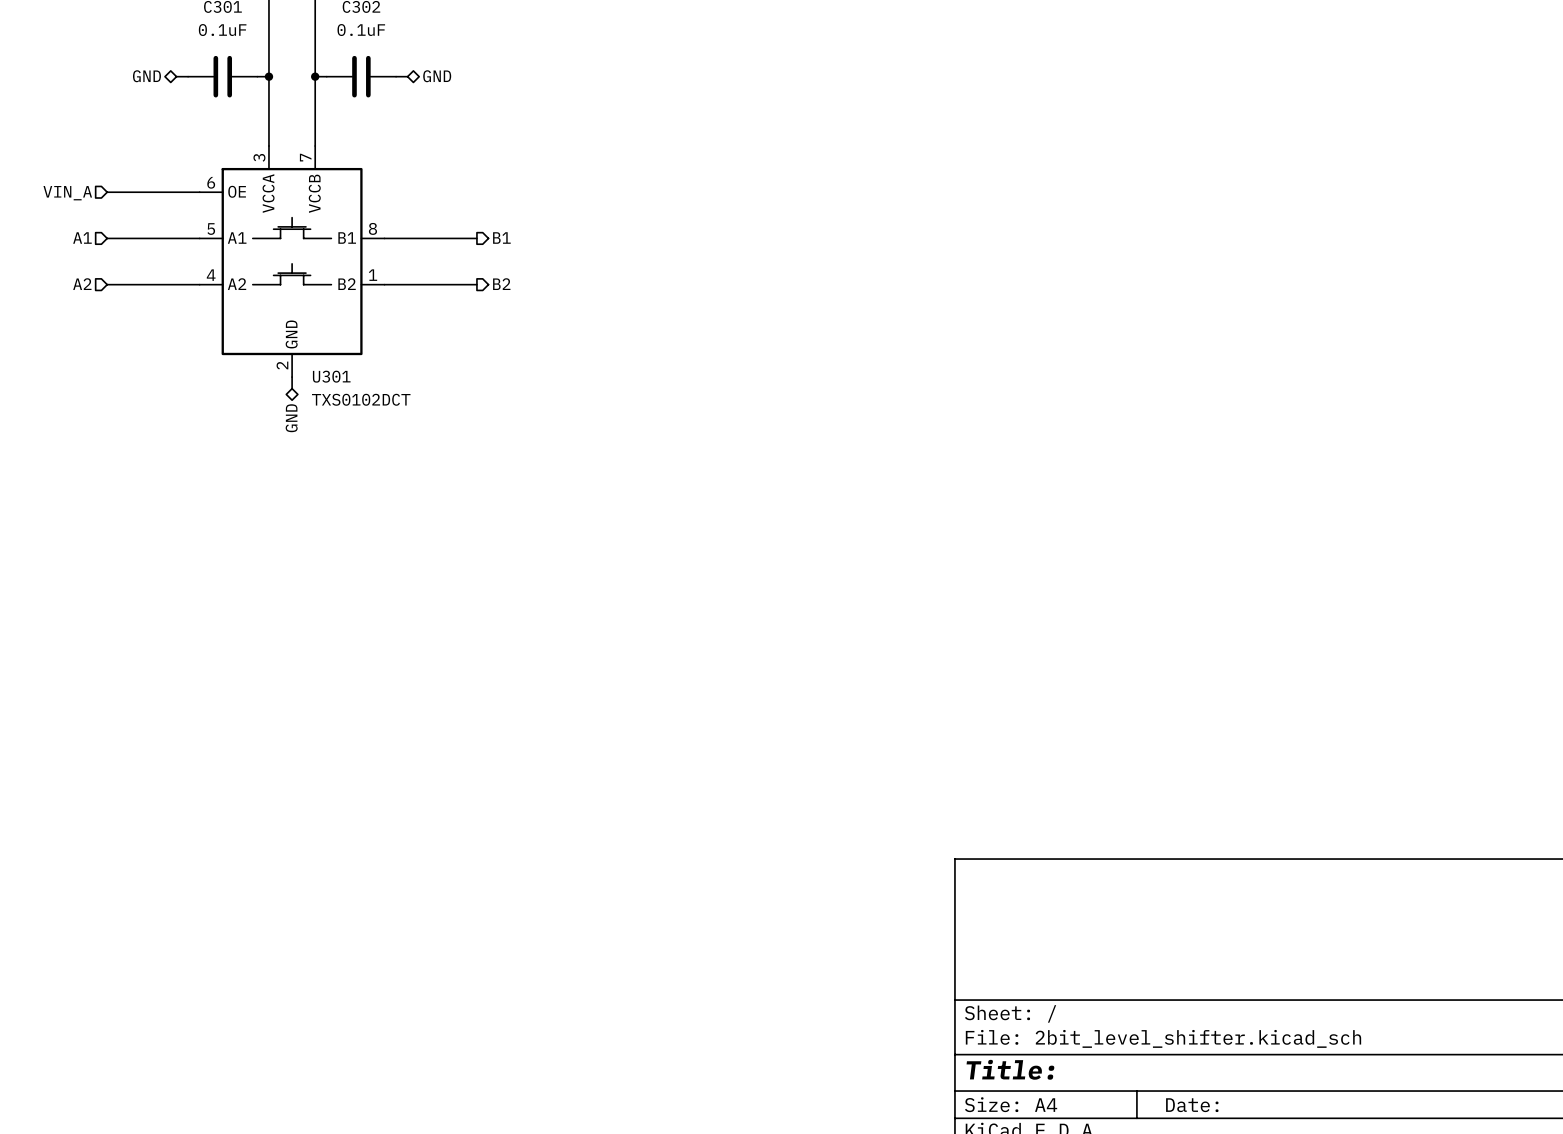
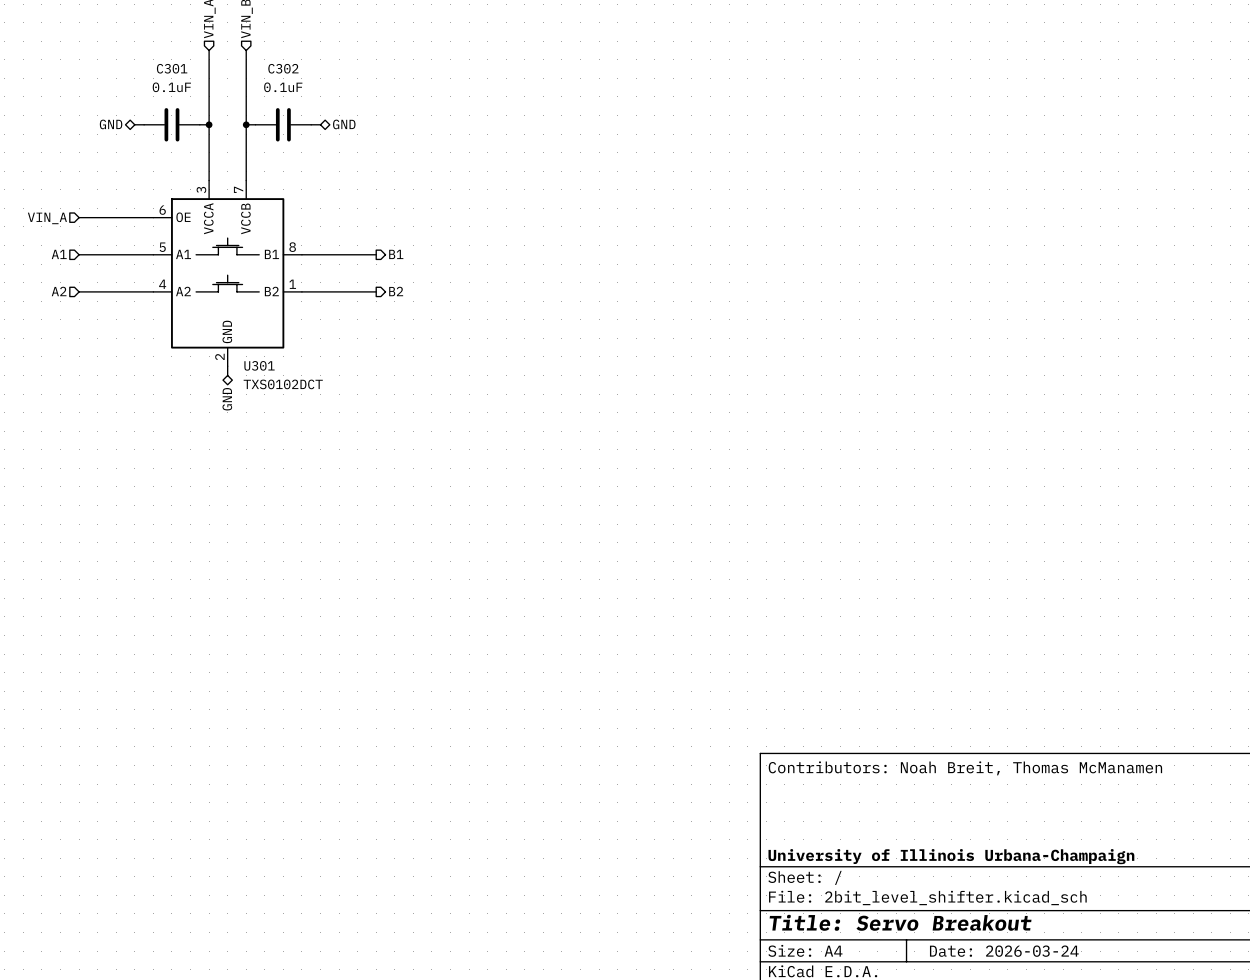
title block: none -> Contributors: Noah Breit, Thomas McManamen (965, 768)
title block: none -> University of Illinois Urbana-Champaign (951, 856)
title block: Title: (1010, 1069) -> Title: Servo Breakout (900, 922)
title block: Date: (1192, 1105) -> Date: 2026-03-24 (1004, 951)

